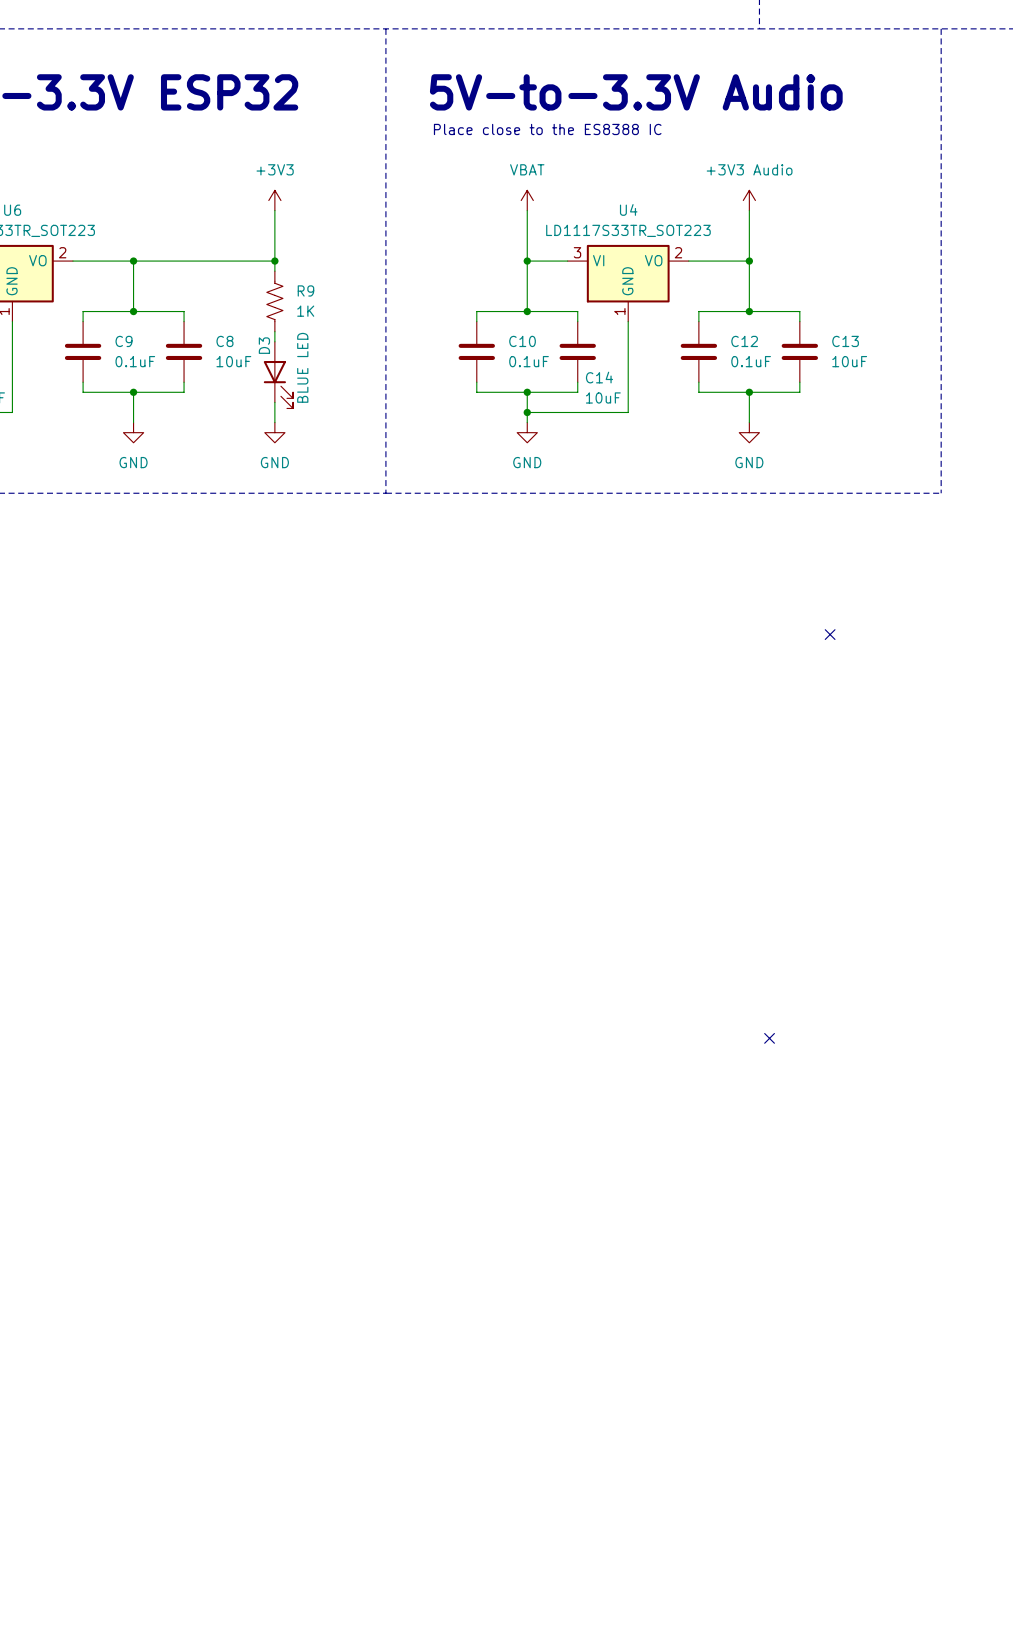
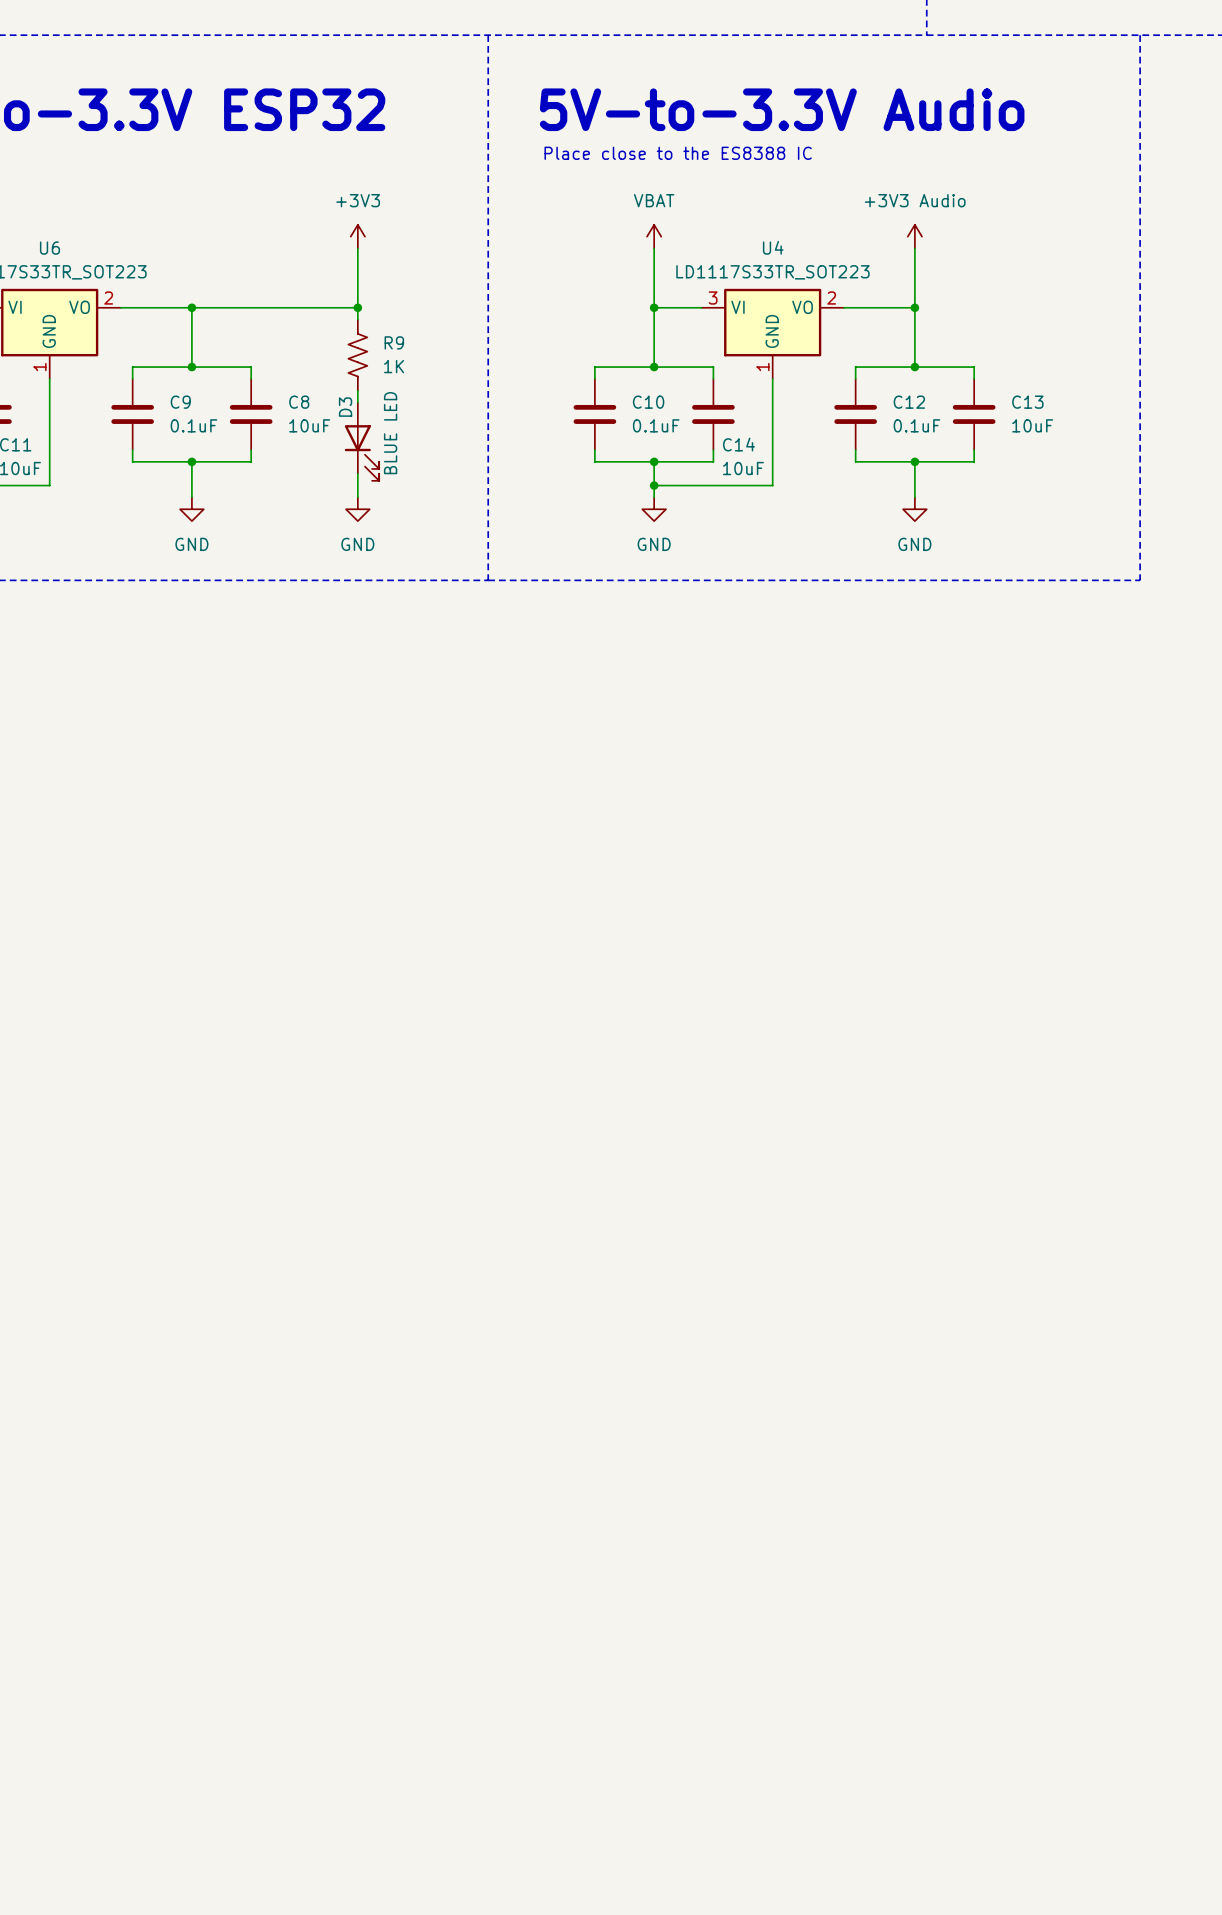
no-connect mark: (830, 634) -> none
no-connect mark: (769, 1038) -> none

